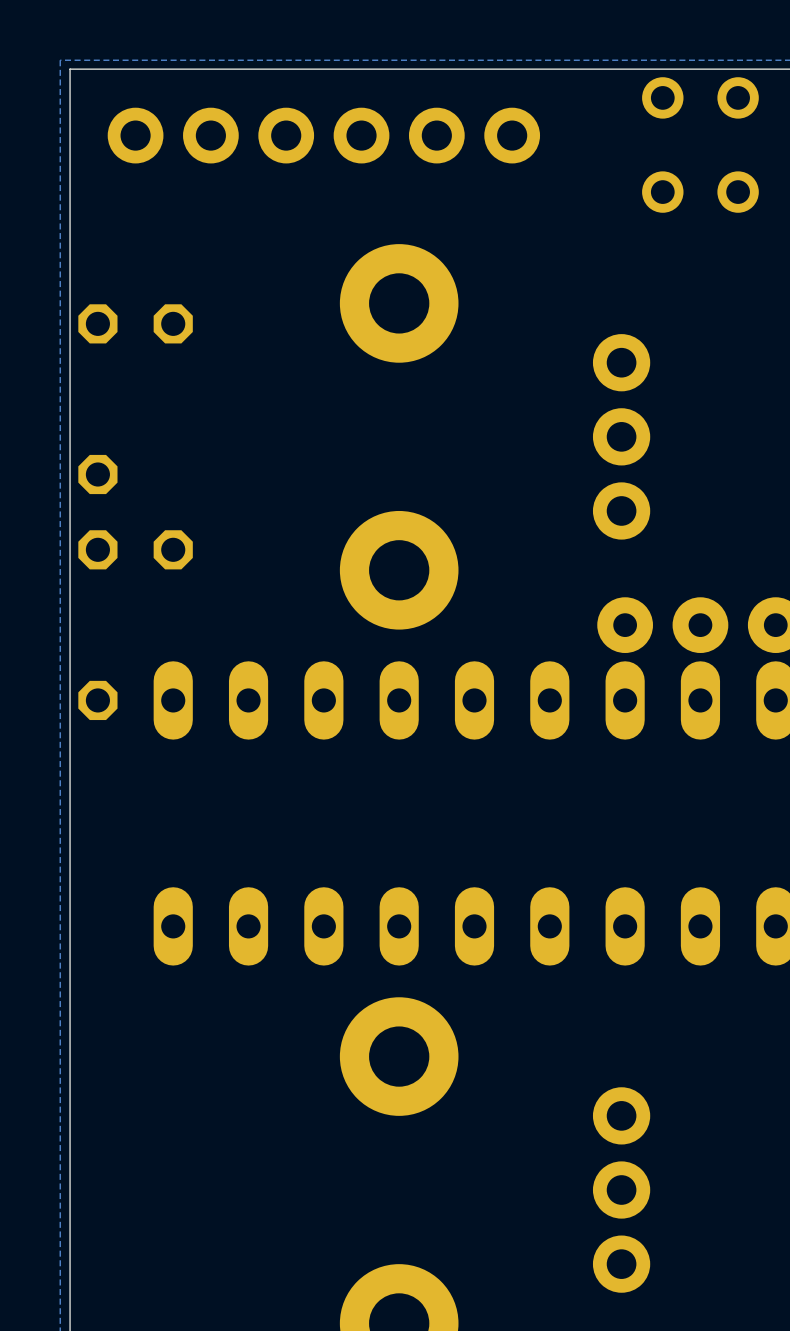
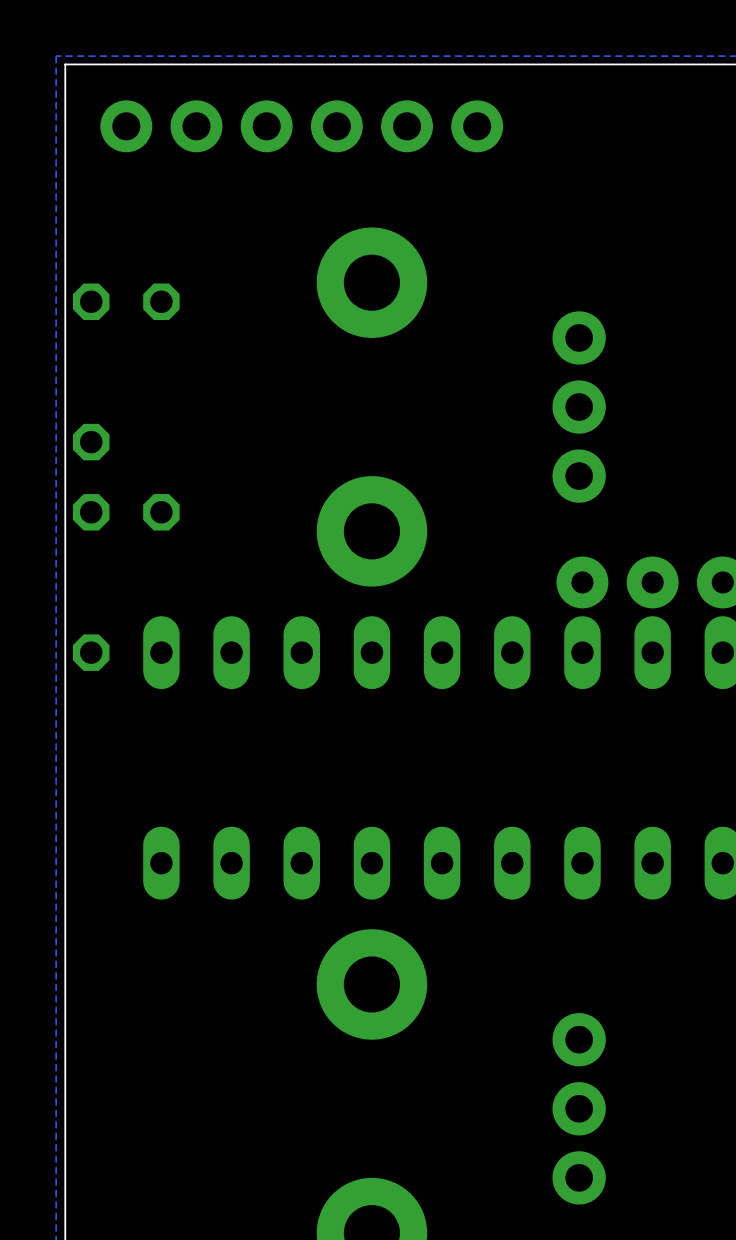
part: (700, 97) -> none
part: (700, 192) -> none

